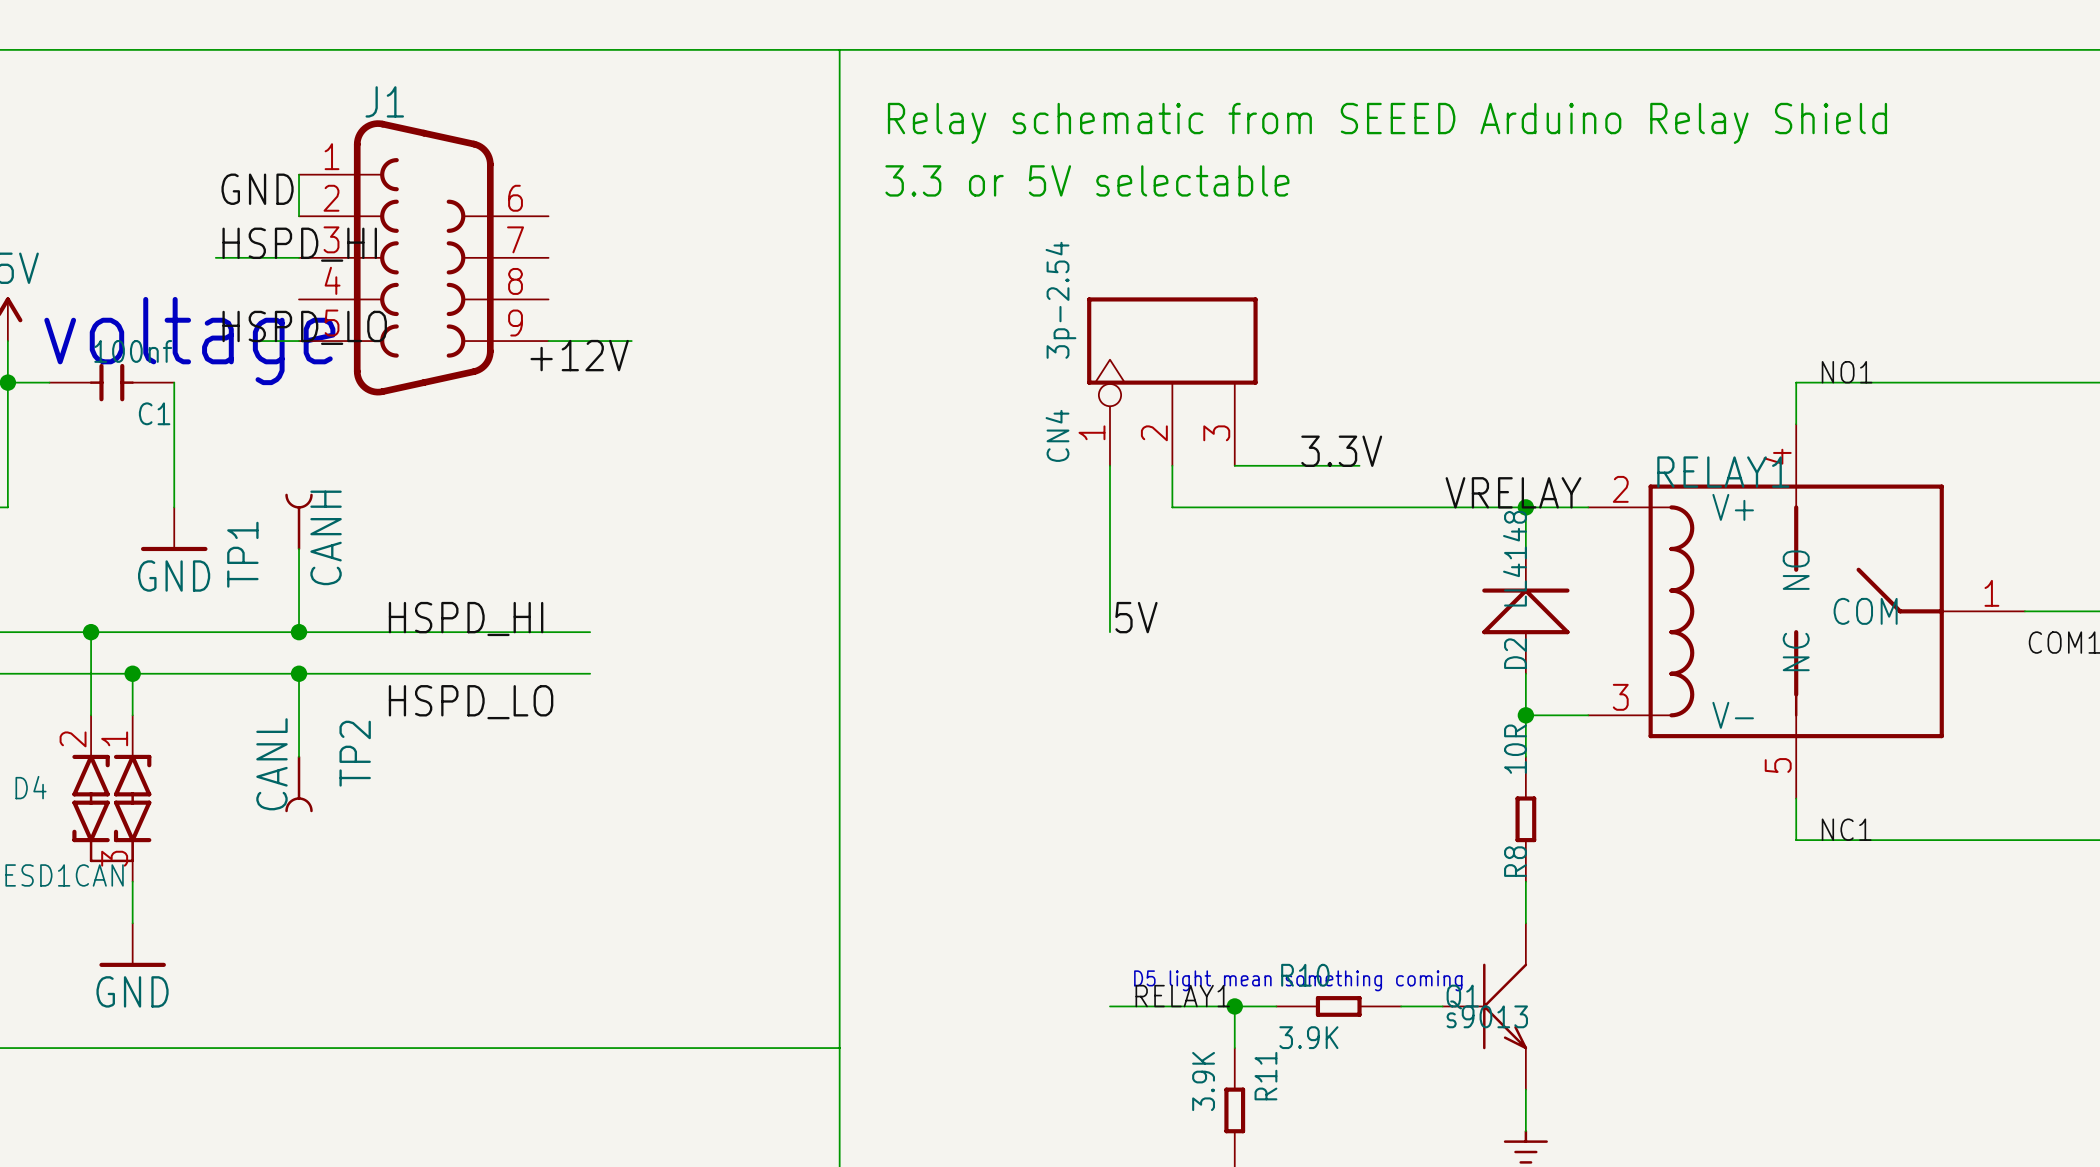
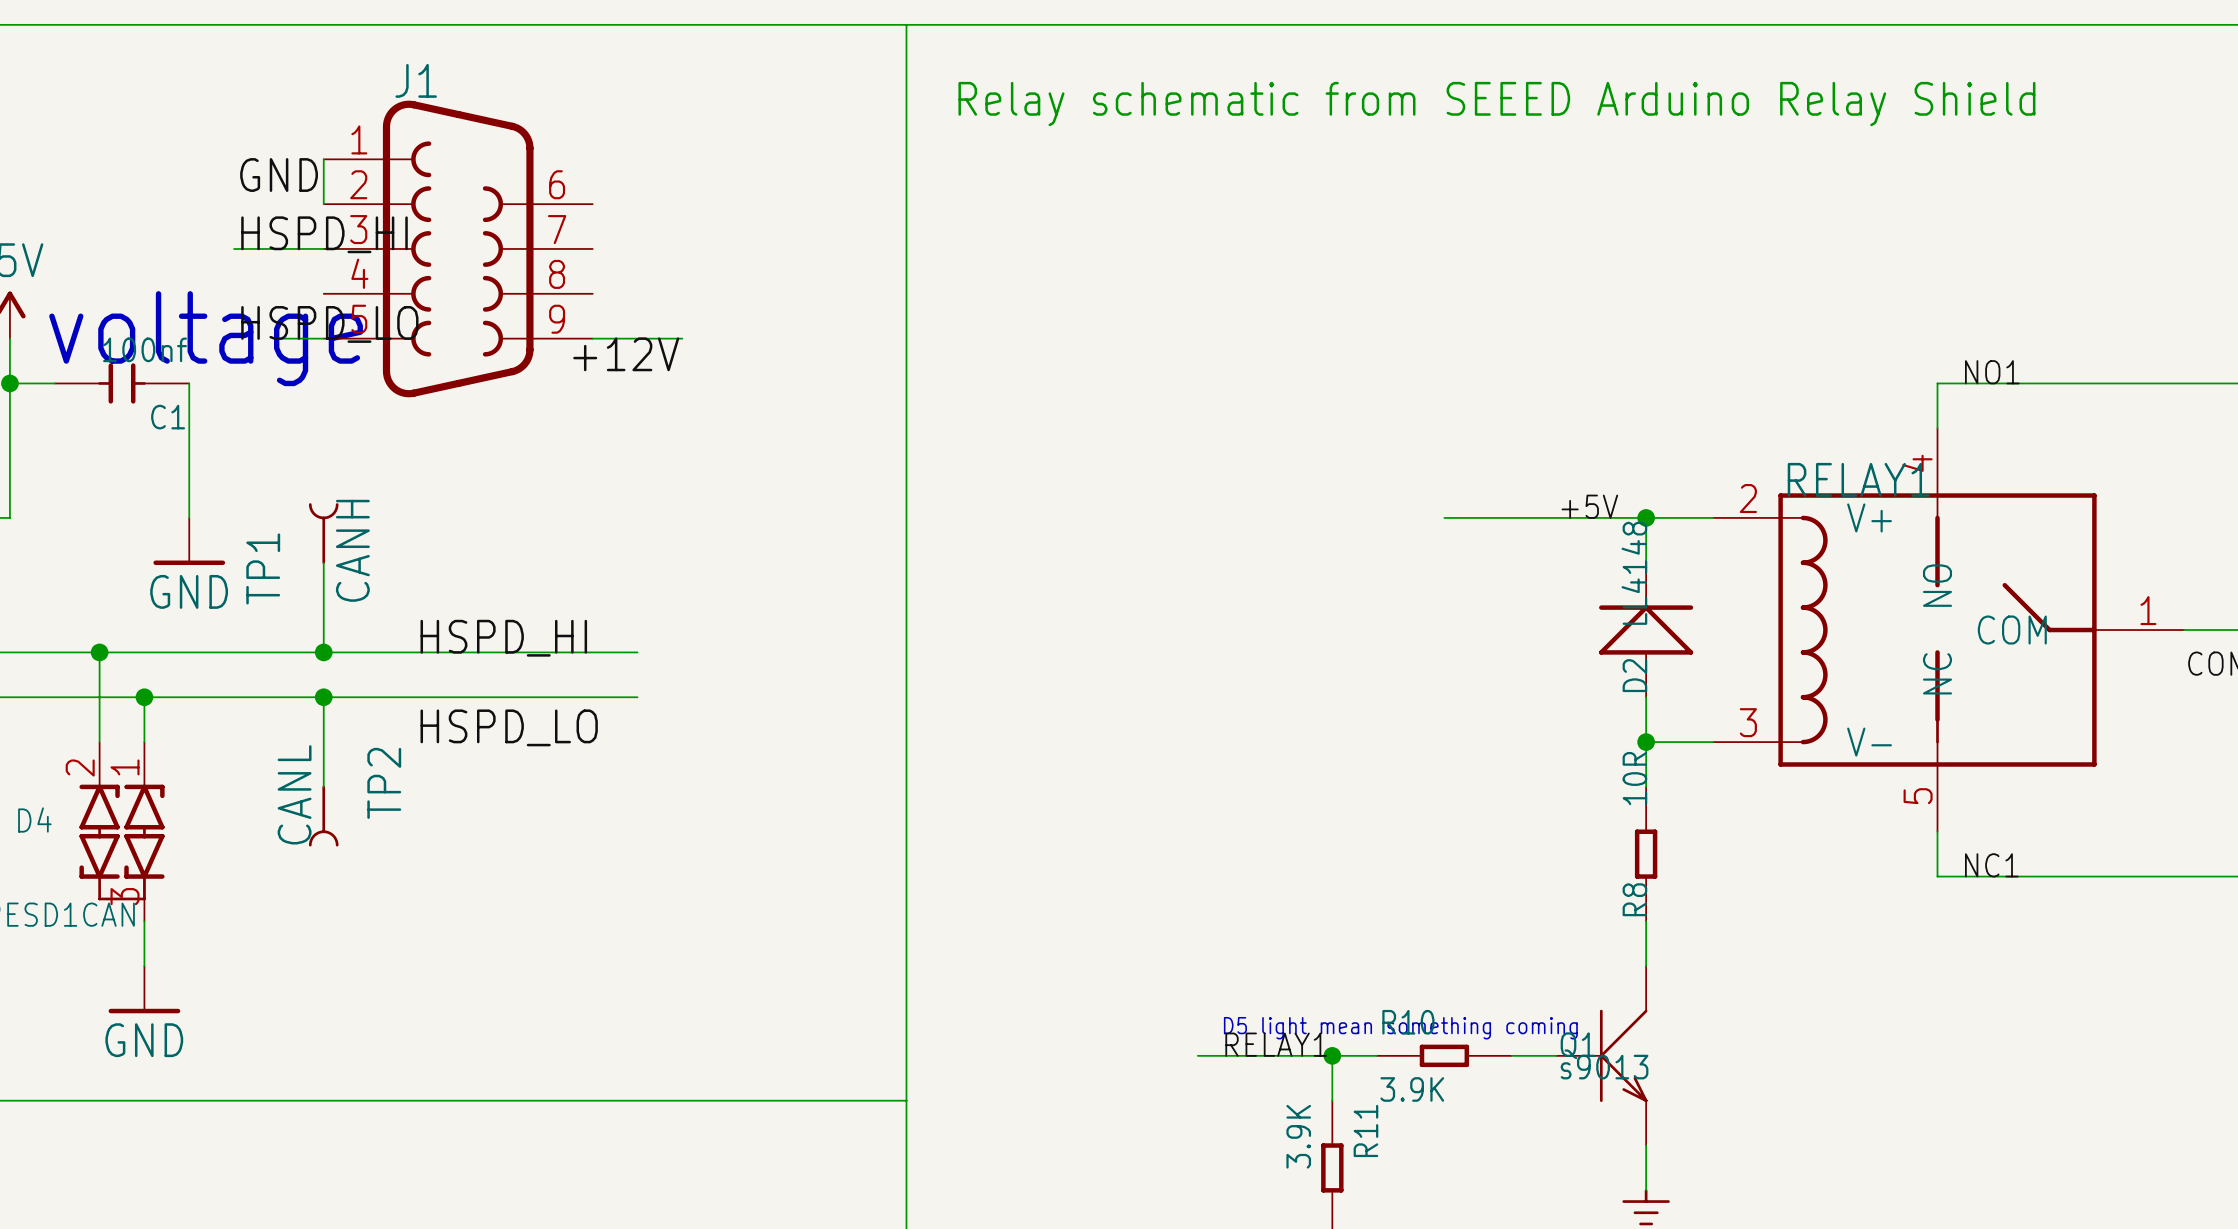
text: 3.3 or 5V selectable (1087, 180) -> none
CN4: 3p-2.54 (1172, 381) -> none
label: 3.3V (1341, 451) -> none
wire: (1109, 465) (1109, 632) -> none
wire: (1172, 465) (1172, 507) (1338, 507) -> none
wire: (1234, 465) (1359, 465) -> none
label: VRELAY (1513, 492) -> +5V (1589, 506)
label: 5V (1136, 617) -> none

